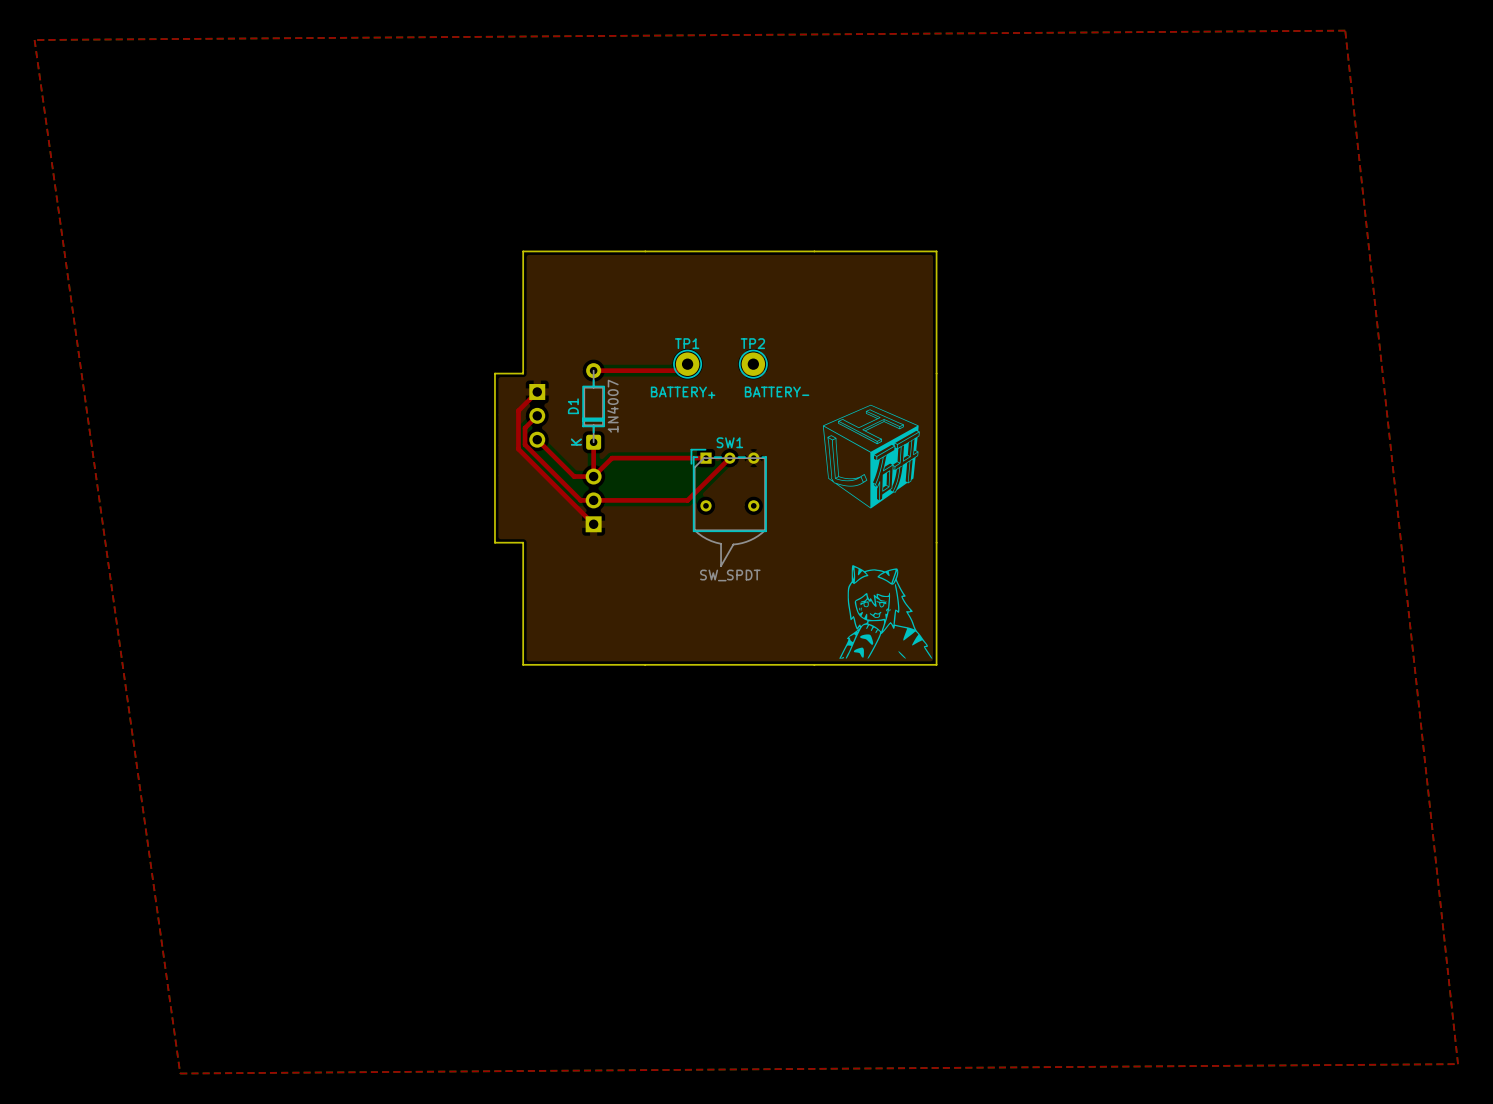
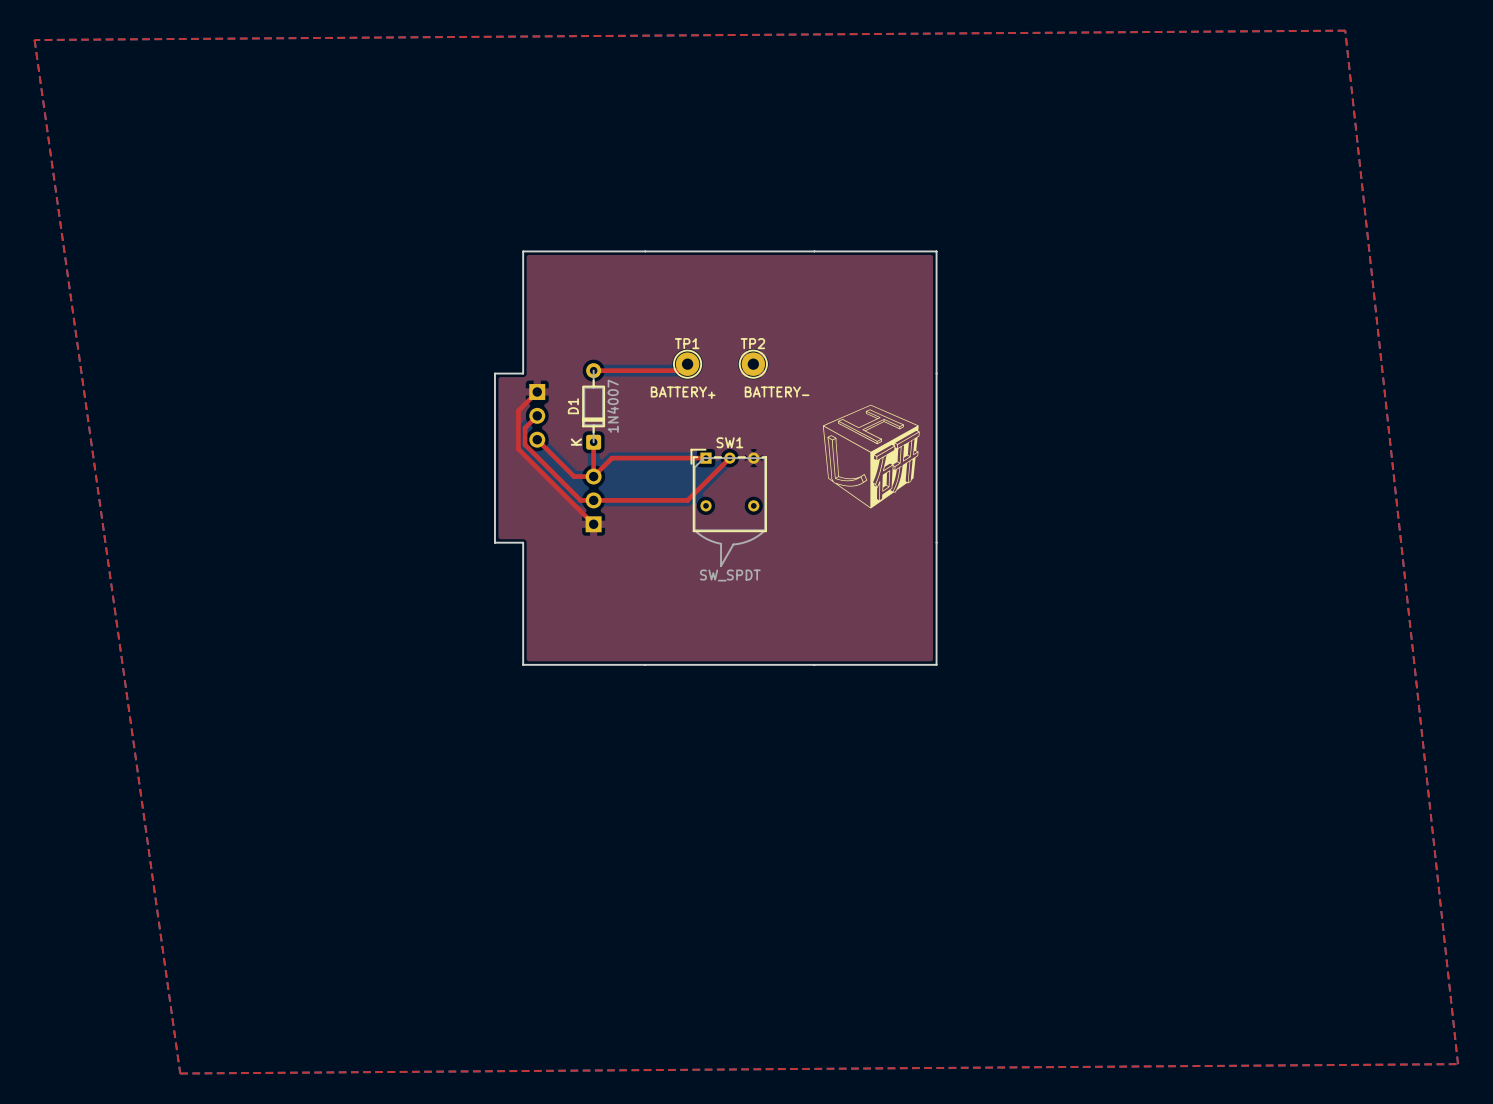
drawing: [839, 565, 933, 659] -> none

